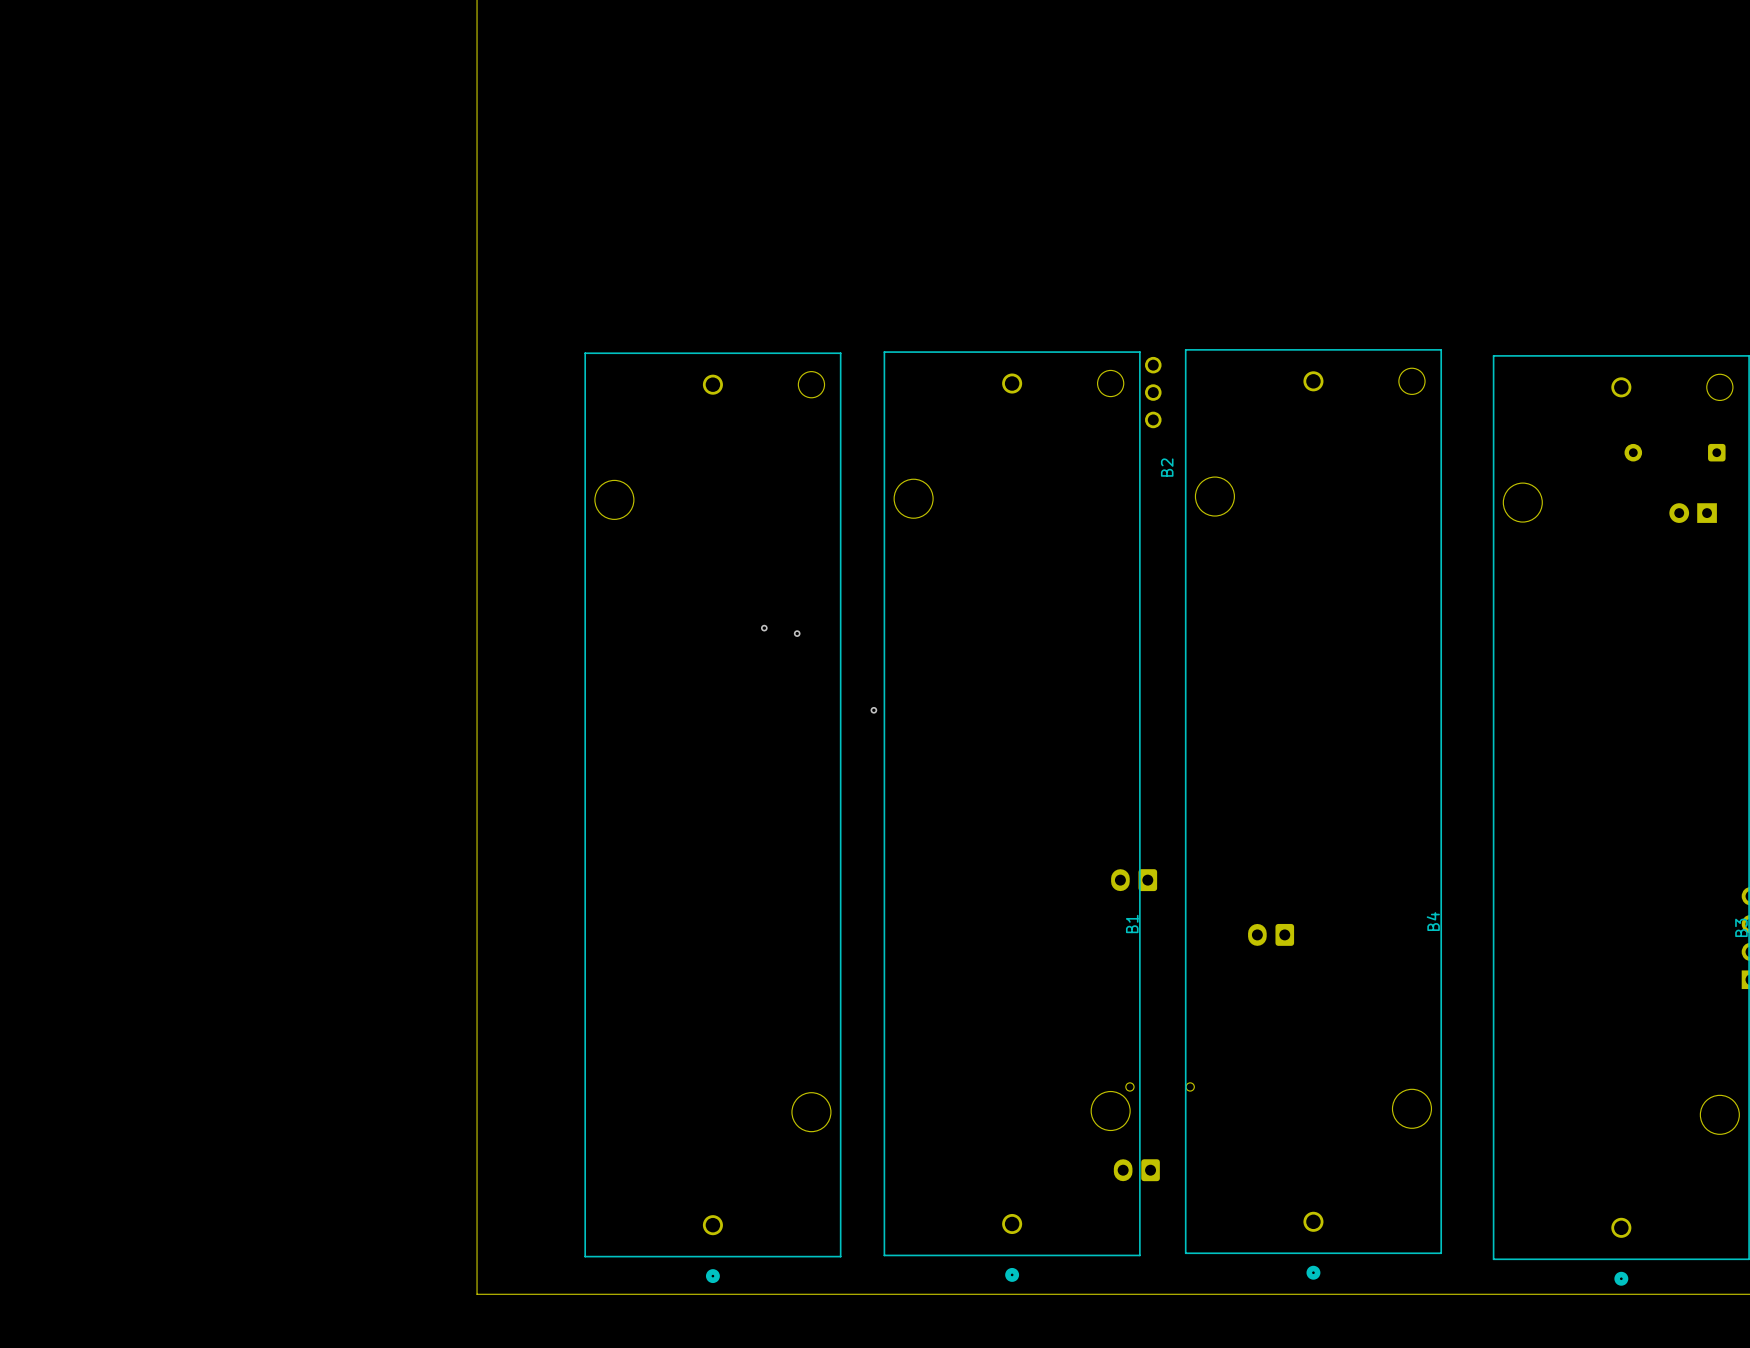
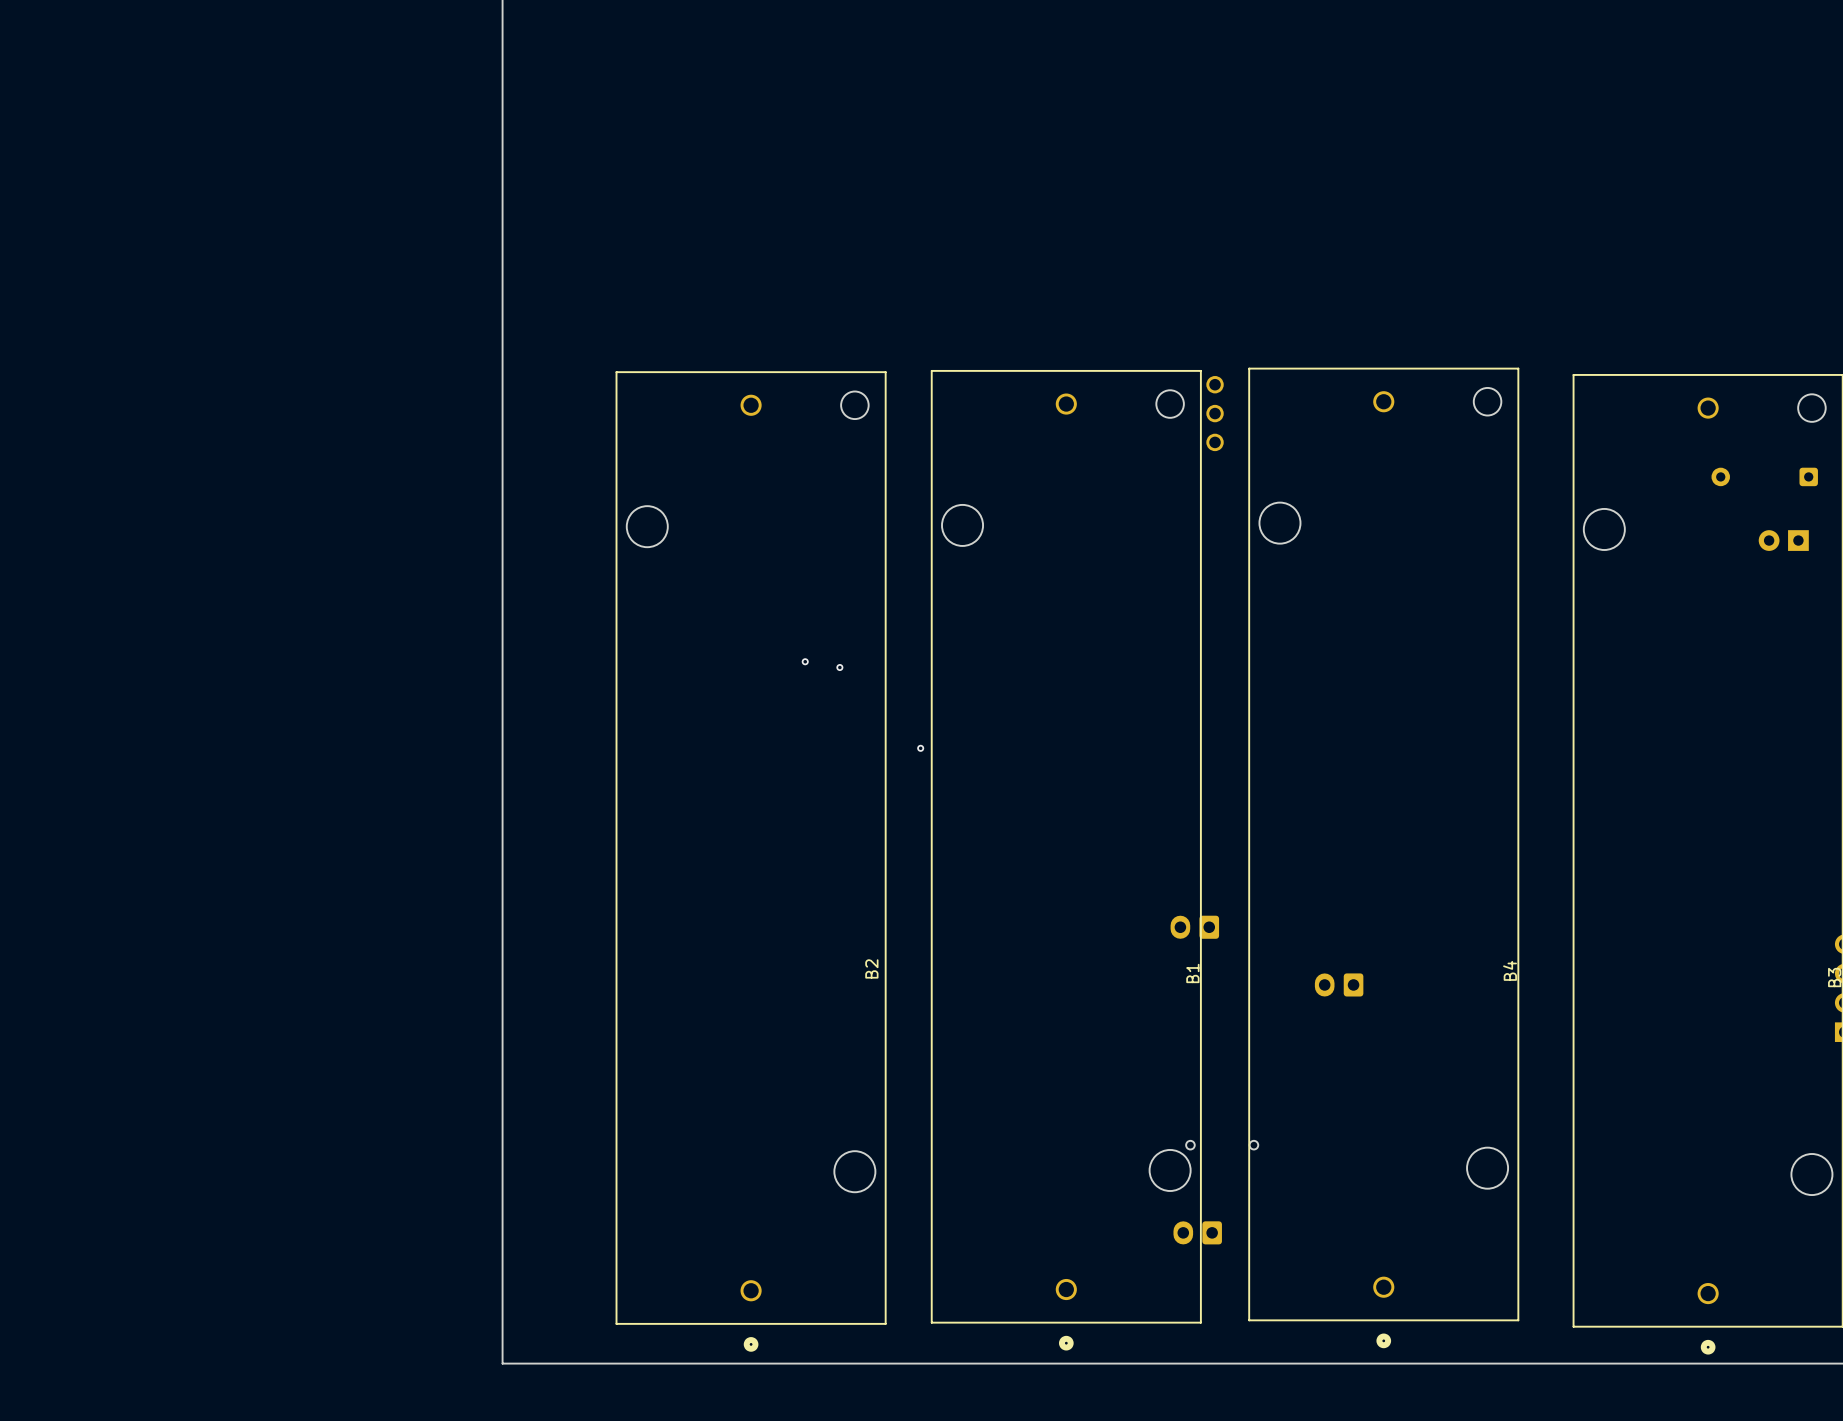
B2 name position: B2 (1167, 467) -> B2 (871, 968)

